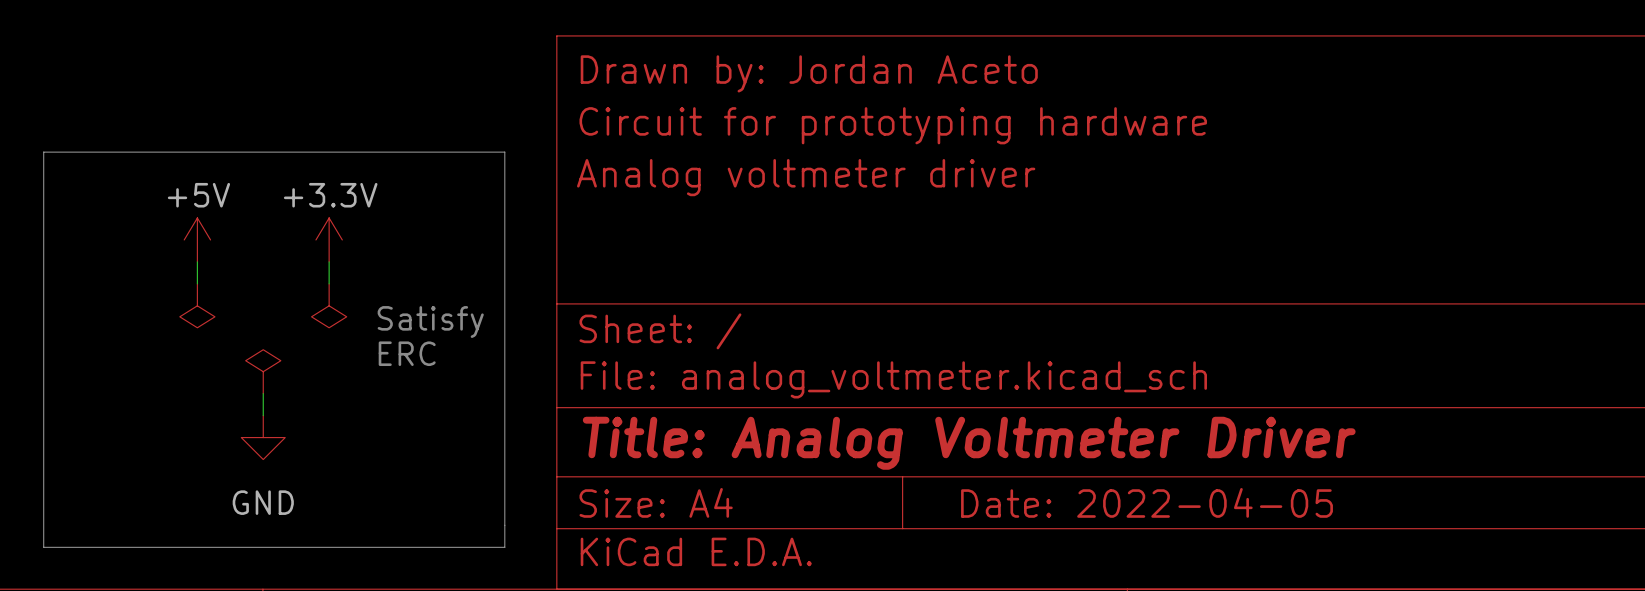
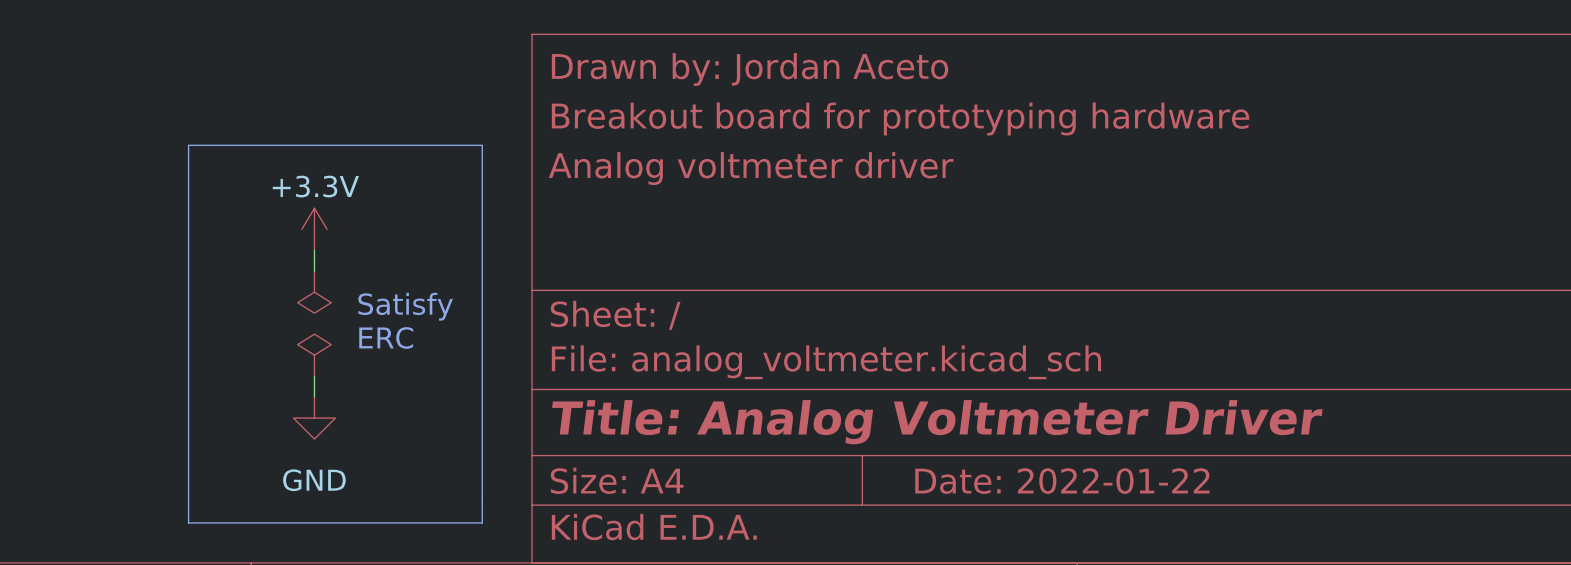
title block: Circuit for prototyping hardware (893, 125) -> Breakout board for prototyping hardware (900, 119)
line: (197, 152) (43, 152) (43, 547) (197, 547) -> (188, 145) (188, 522)
power symbol: +5V (197, 239) -> none
power symbol: (197, 305) -> none
power symbol position: (263, 371) -> (314, 355)
wire: (263, 393) (263, 415) -> (314, 376) (314, 397)
power symbol position: GND (263, 437) -> GND (314, 418)
title block: Date: 2022-04-05 (1147, 502) -> Date: 2022-01-22 (1062, 481)

